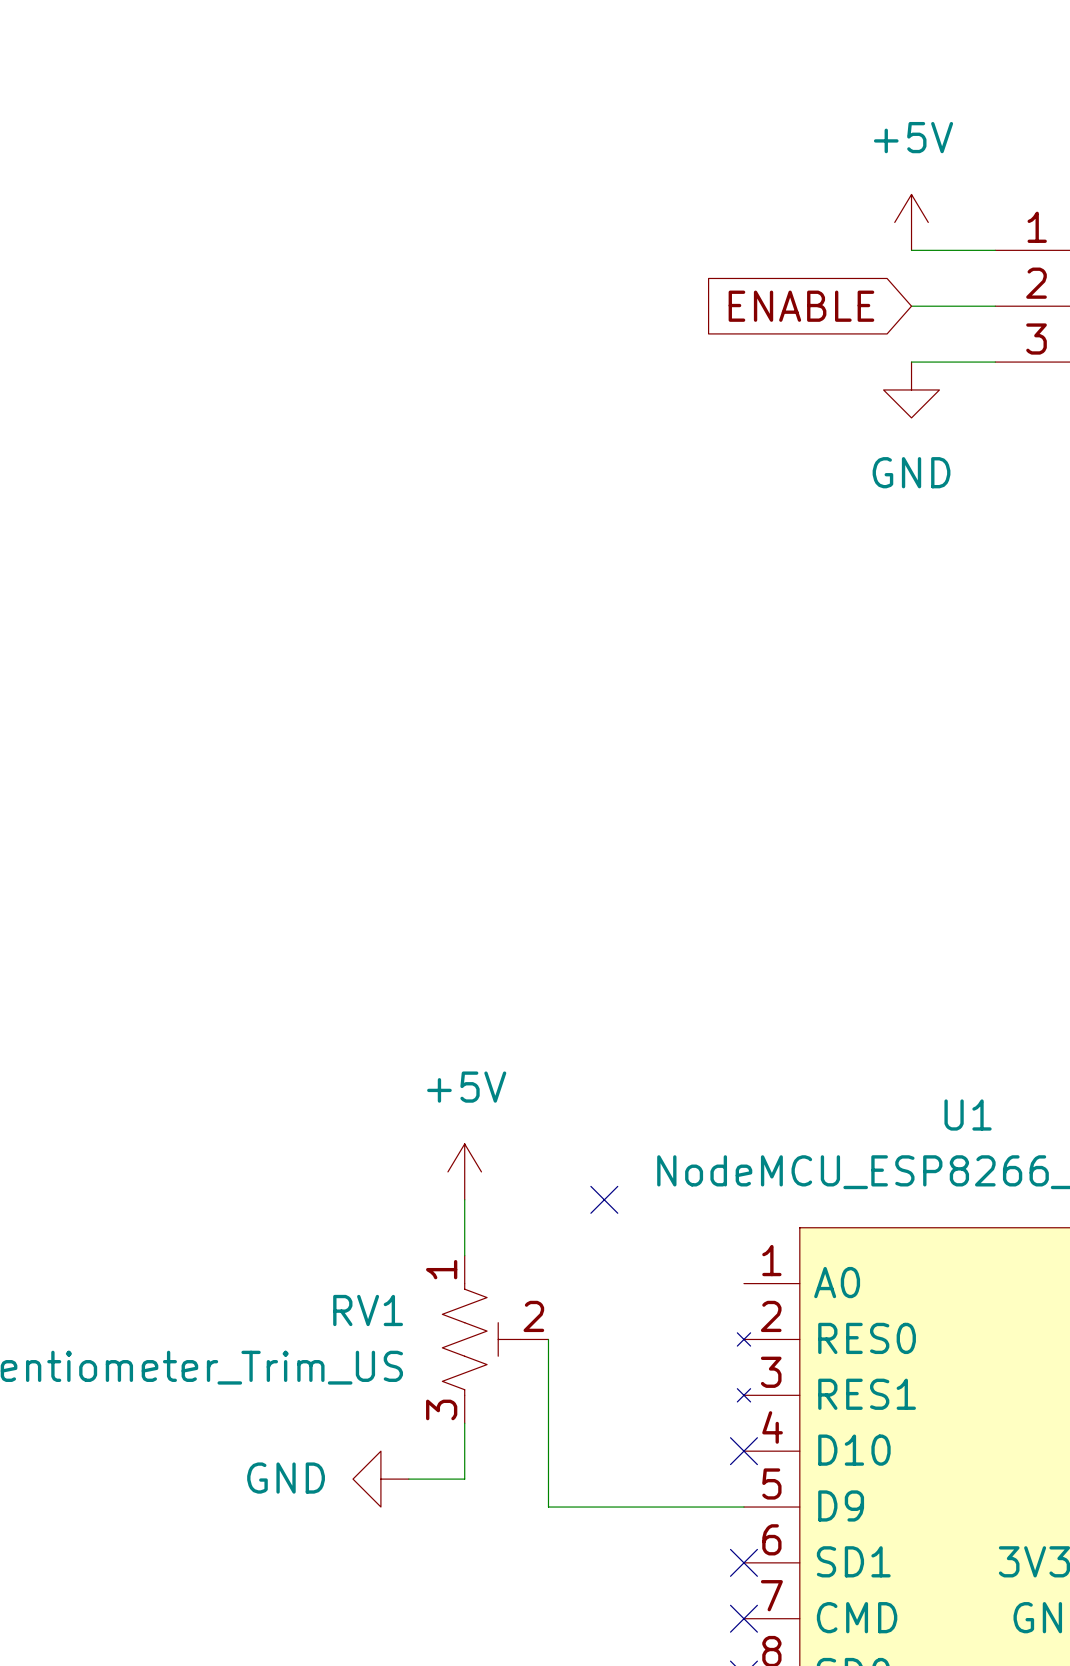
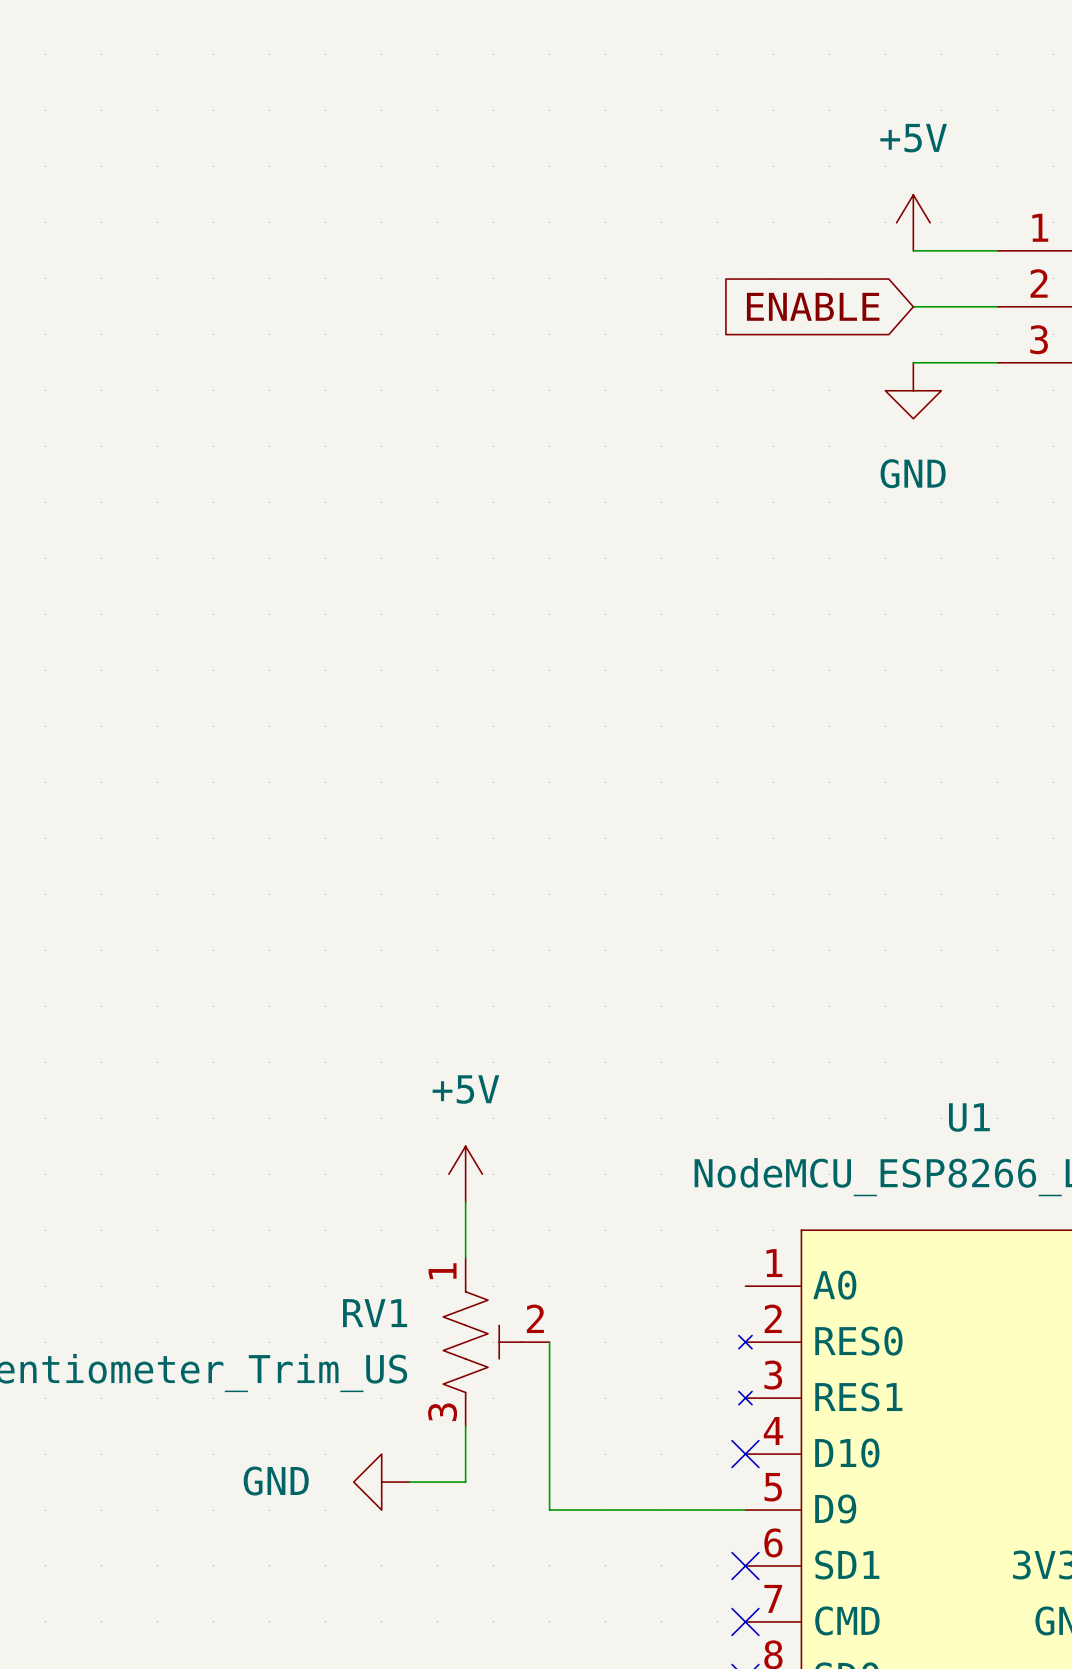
no-connect mark: (604, 1199) -> none

